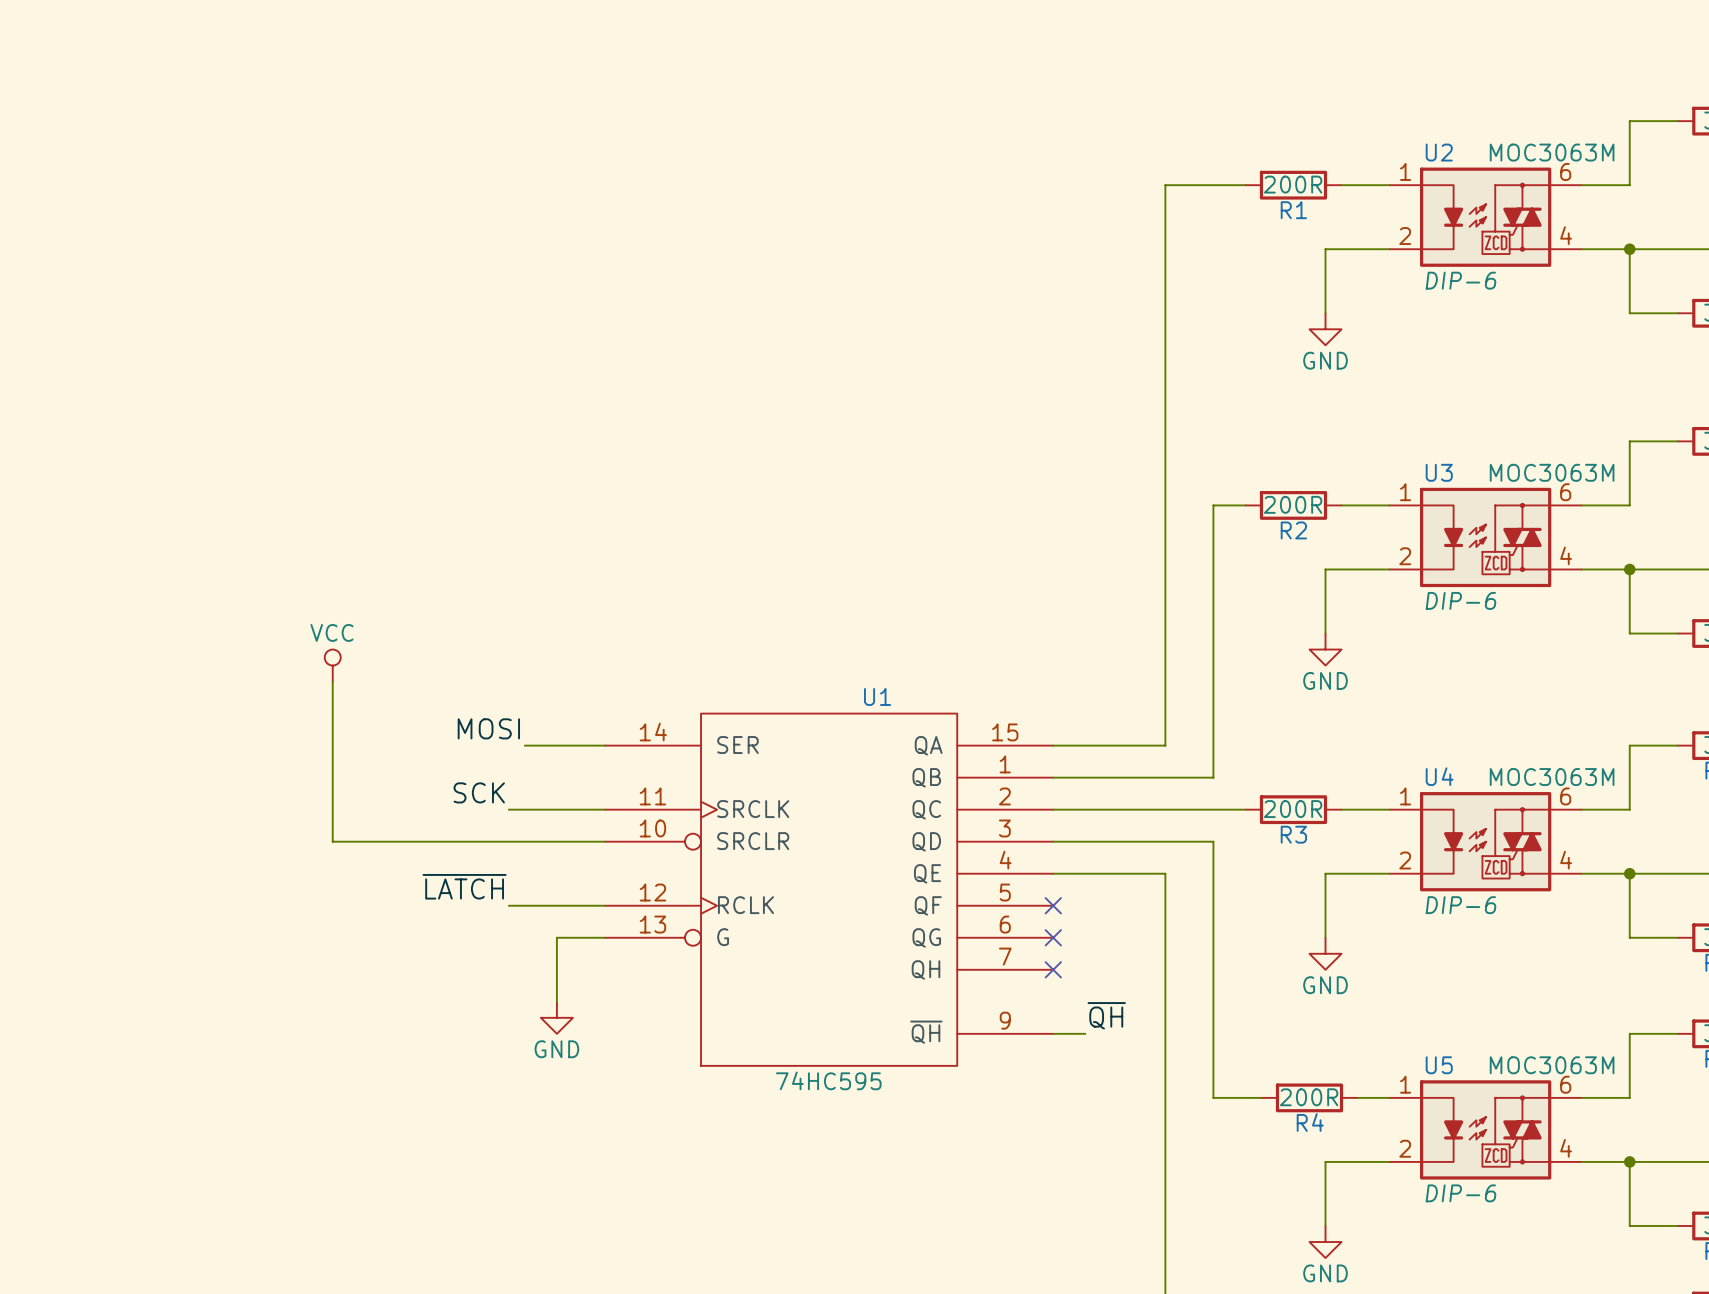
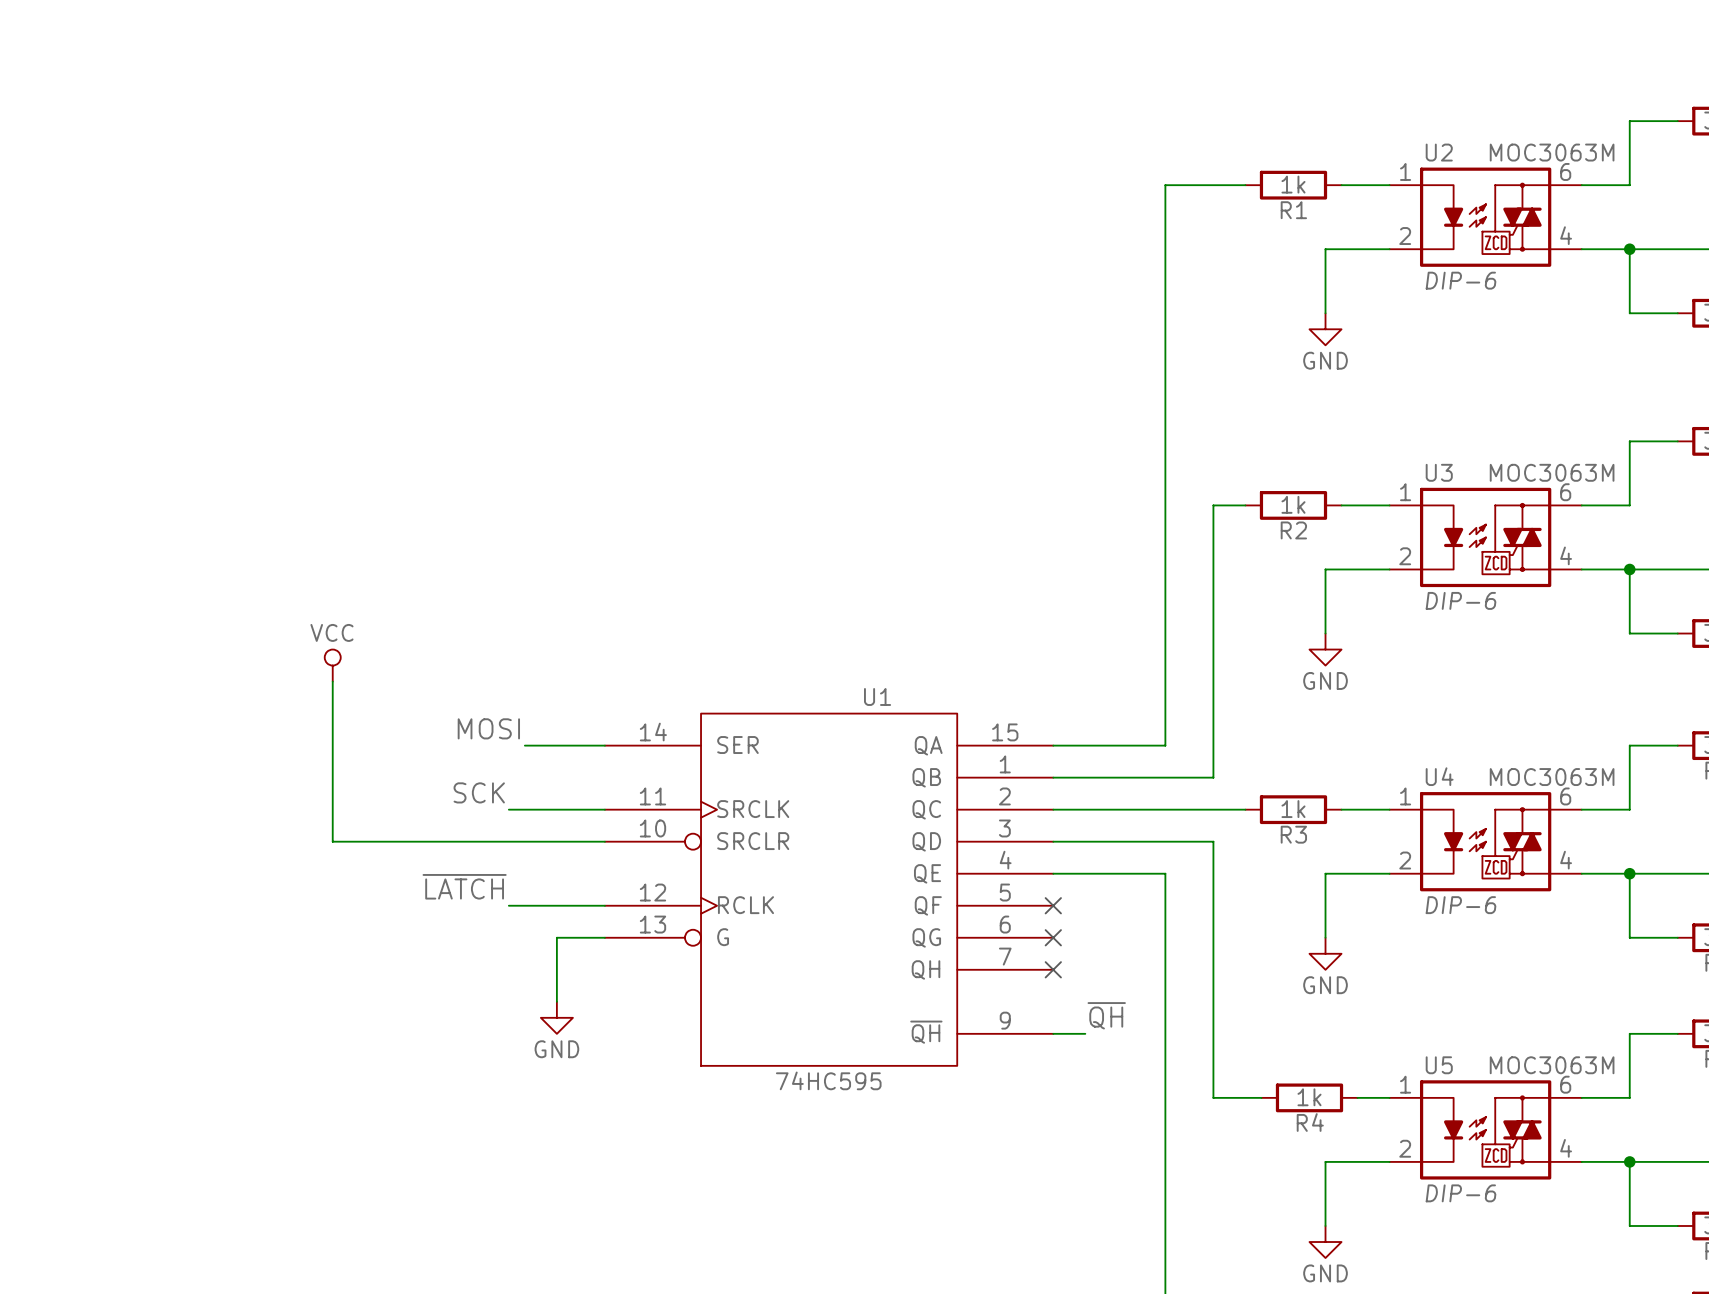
R1 value: 200R (1293, 184) -> 1k (1293, 184)
R2 value: 200R (1293, 504) -> 1k (1293, 504)
R3 value: 200R (1293, 809) -> 1k (1293, 809)
R4 value: 200R (1309, 1097) -> 1k (1309, 1097)

